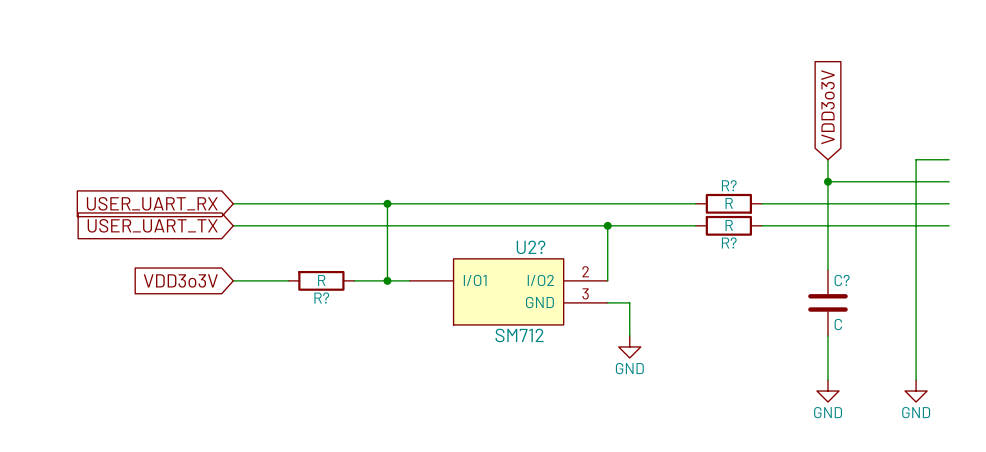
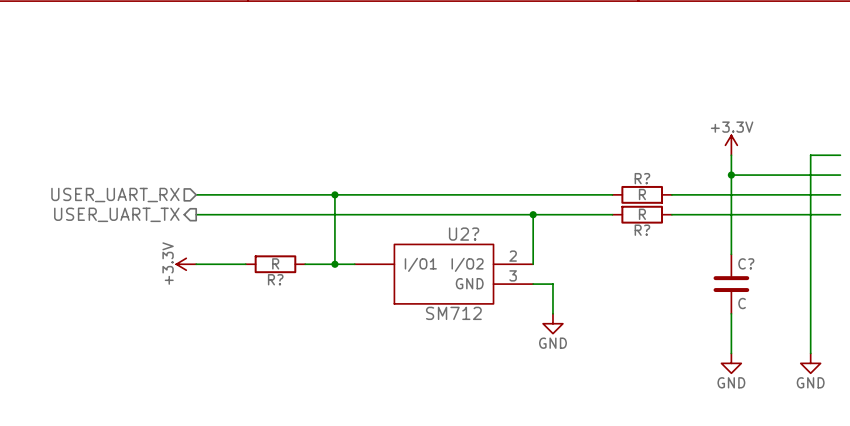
global label: VDD3o3V (828, 107) -> none
power symbol: none -> +3.3V (731, 145)
hierarchical label: none -> USER_UART_RX (115, 195)
global label: USER_UART_RX (152, 203) -> none
hierarchical label: none -> USER_UART_TX (116, 214)
global label: USER_UART_TX (152, 225) -> none
global label: VDD3o3V (180, 280) -> none
power symbol: none -> +3.3V (186, 264)

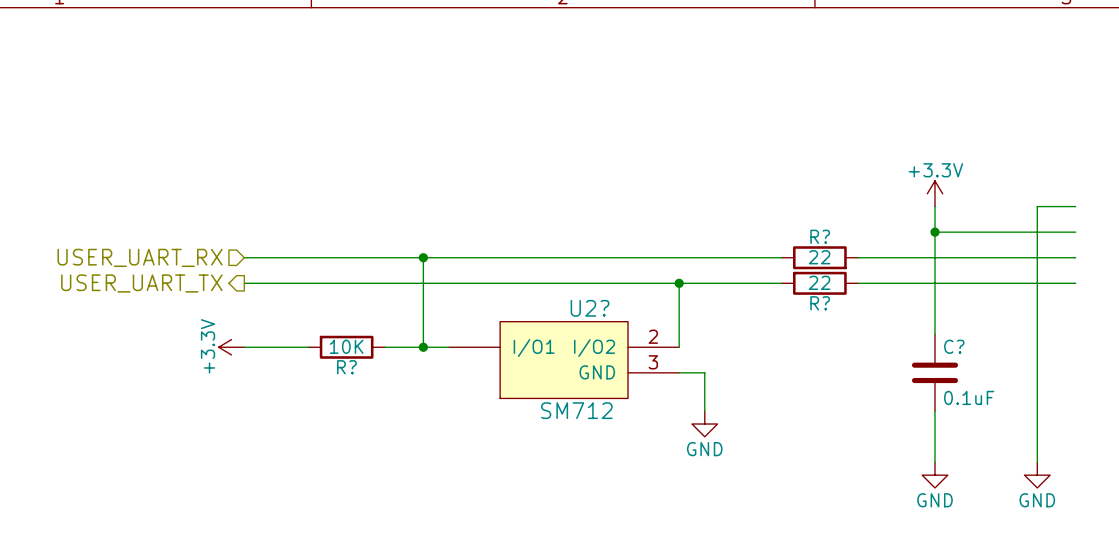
R? value: R (642, 194) -> 22 (819, 257)
R? value: R (642, 214) -> 22 (819, 282)
R? value: R (275, 263) -> 10K (346, 346)
C? value: C (742, 303) -> 0.1uF (969, 397)

